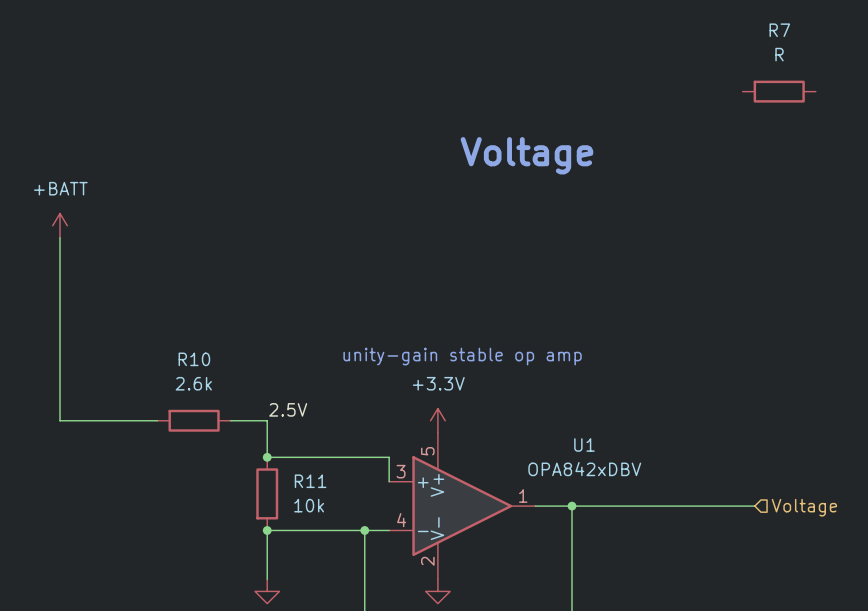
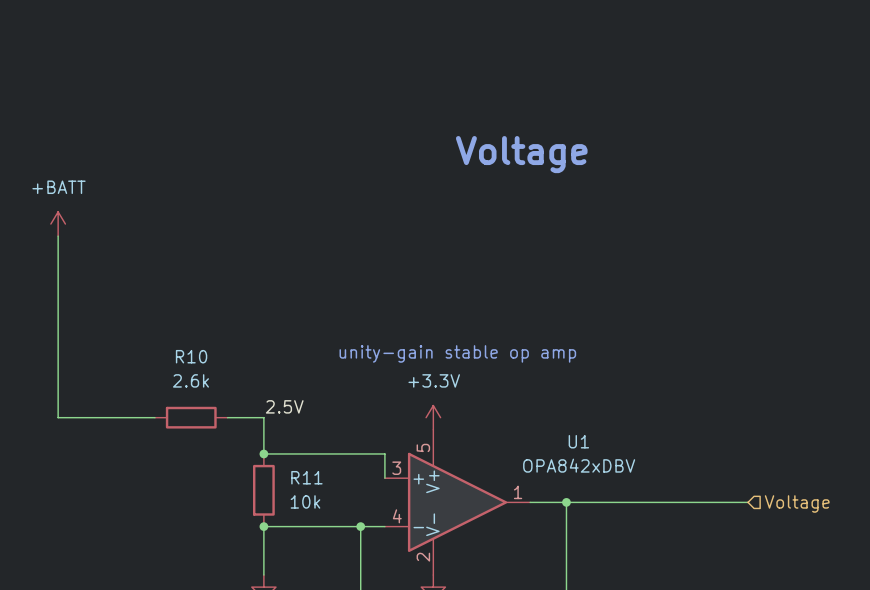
R7: R (779, 91) -> none

